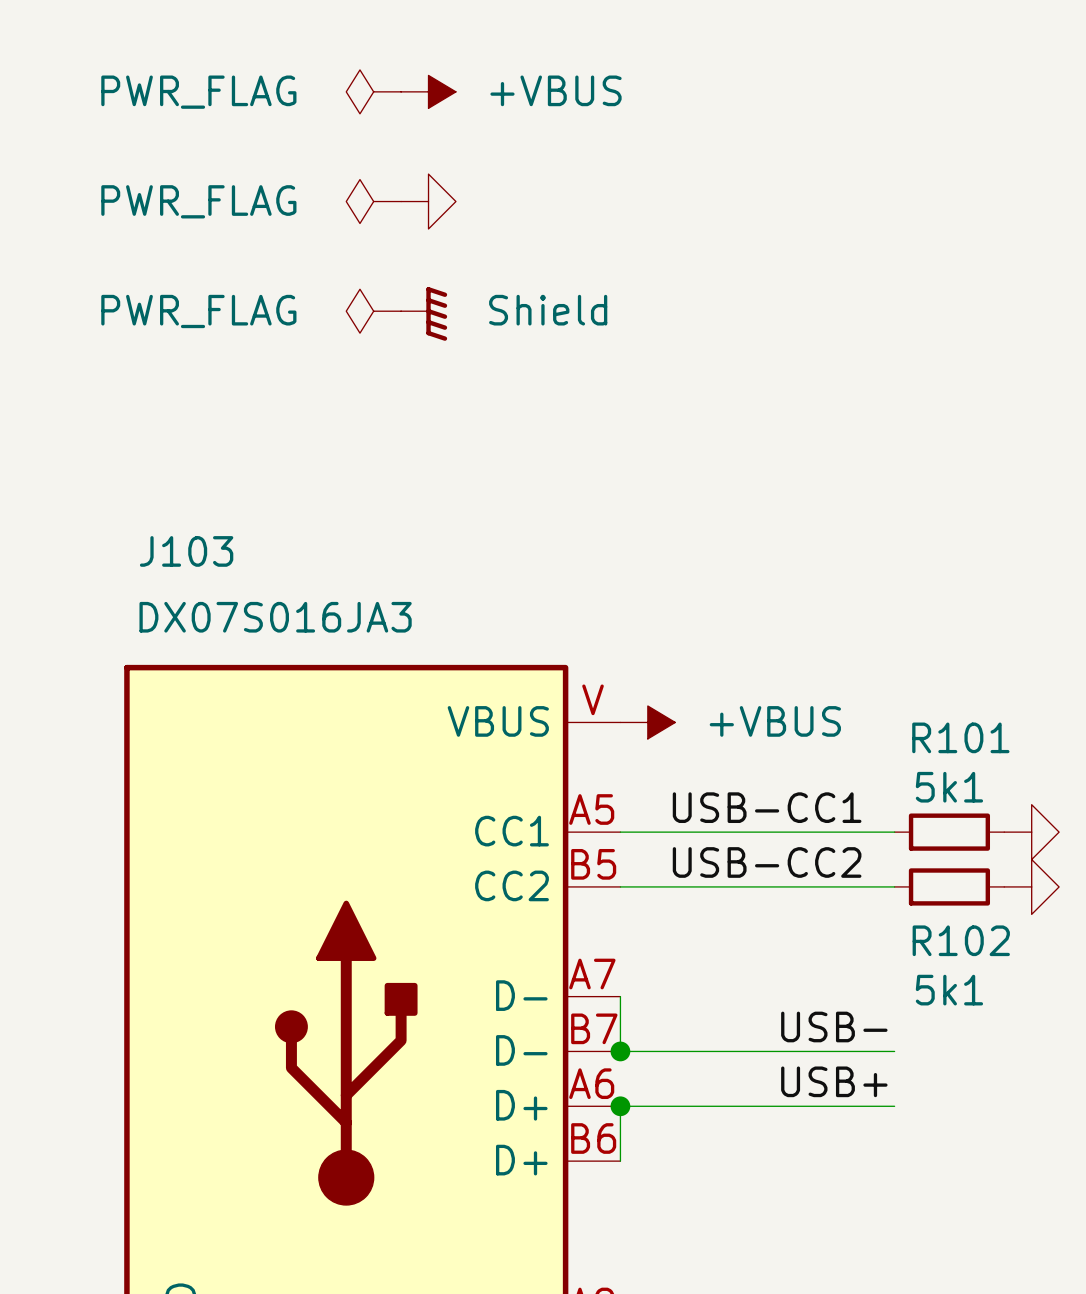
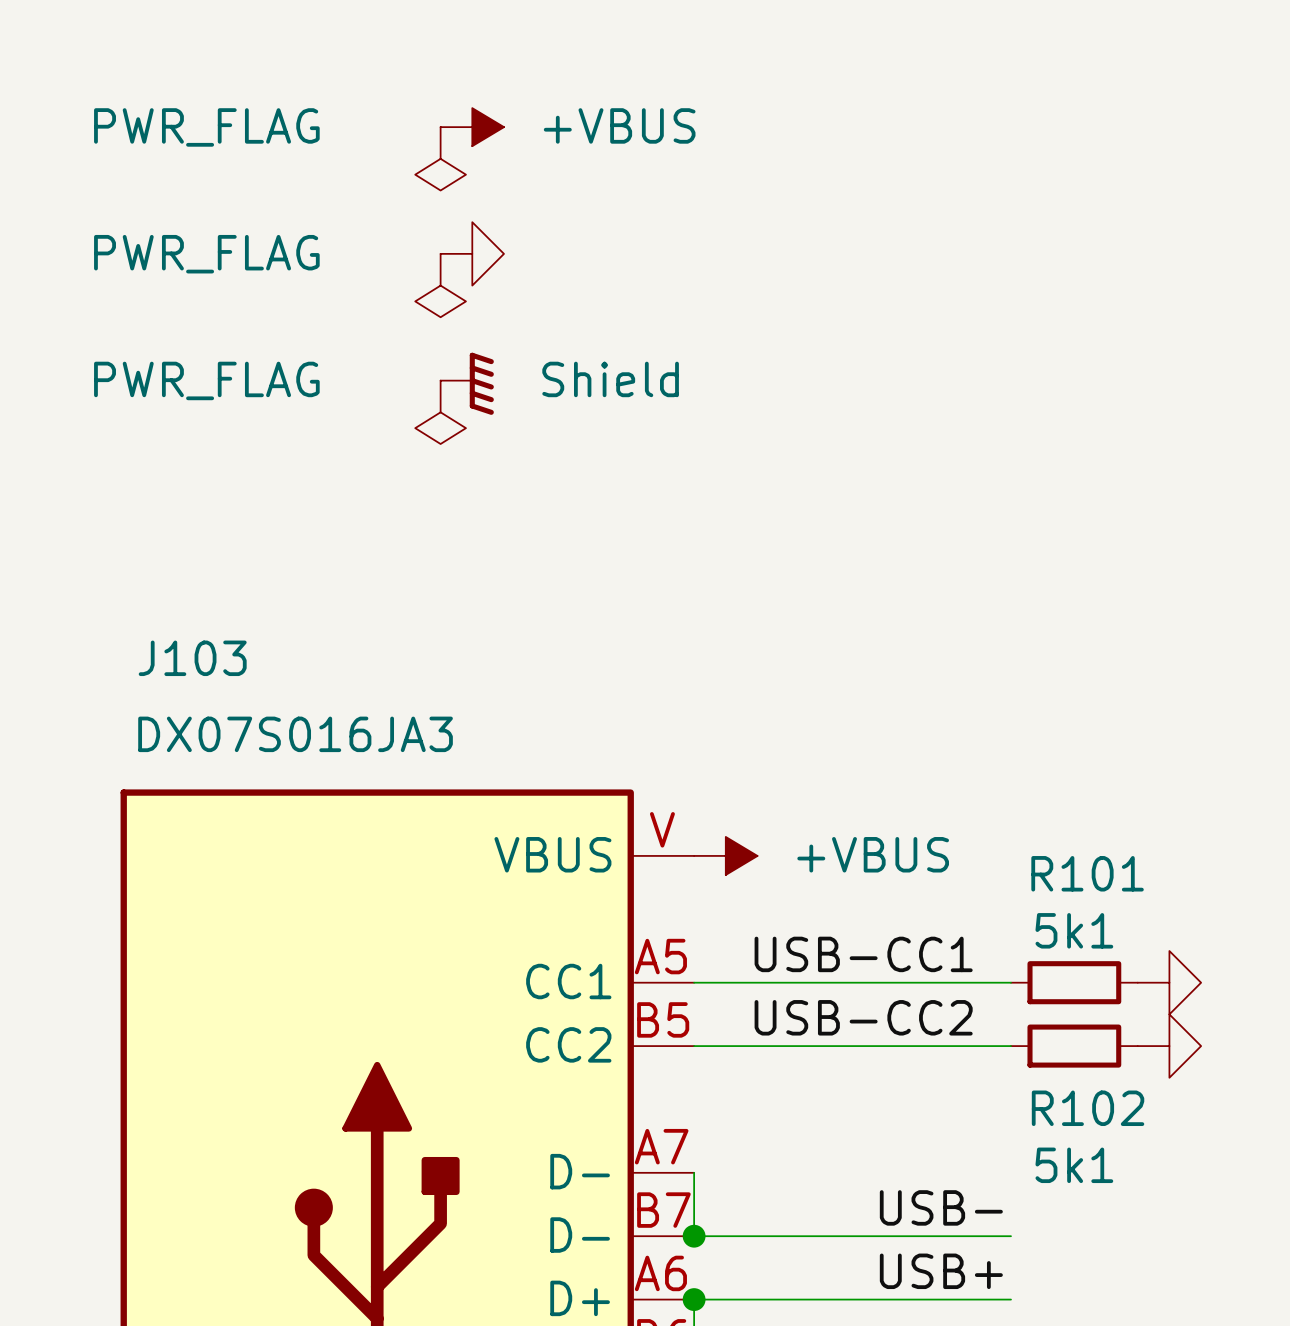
power symbol rotation: 0° (373, 91) -> 90° counterclockwise (440, 158)
power symbol position: PWR_FLAG (373, 91) -> PWR_FLAG (440, 158)
power symbol rotation: 0° (373, 201) -> 90° counterclockwise (440, 285)
power symbol position: PWR_FLAG (373, 201) -> PWR_FLAG (440, 285)
power symbol rotation: 0° (373, 311) -> 90° counterclockwise (440, 412)
power symbol position: PWR_FLAG (373, 311) -> PWR_FLAG (440, 412)

